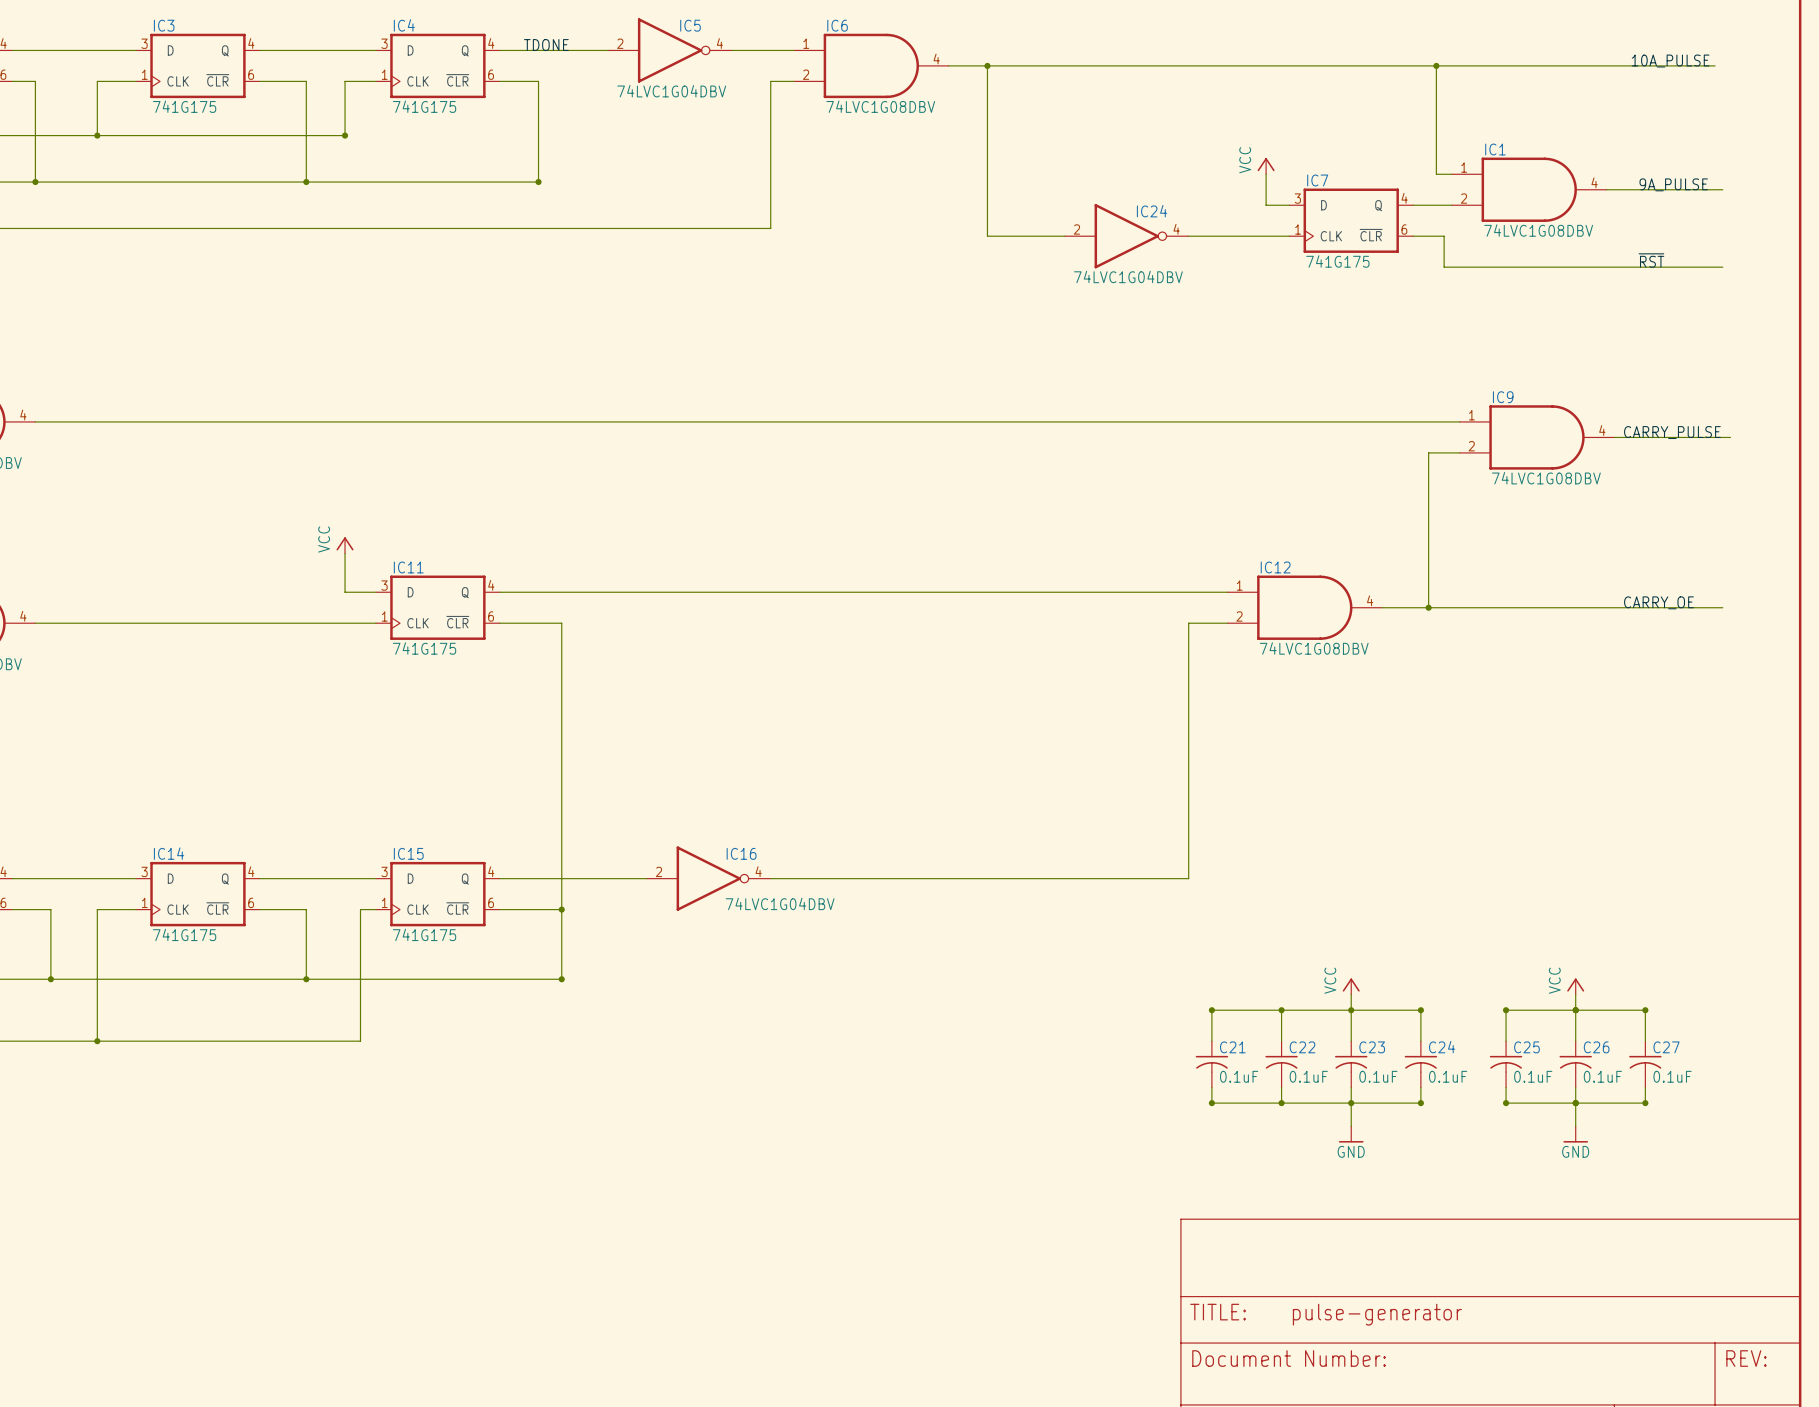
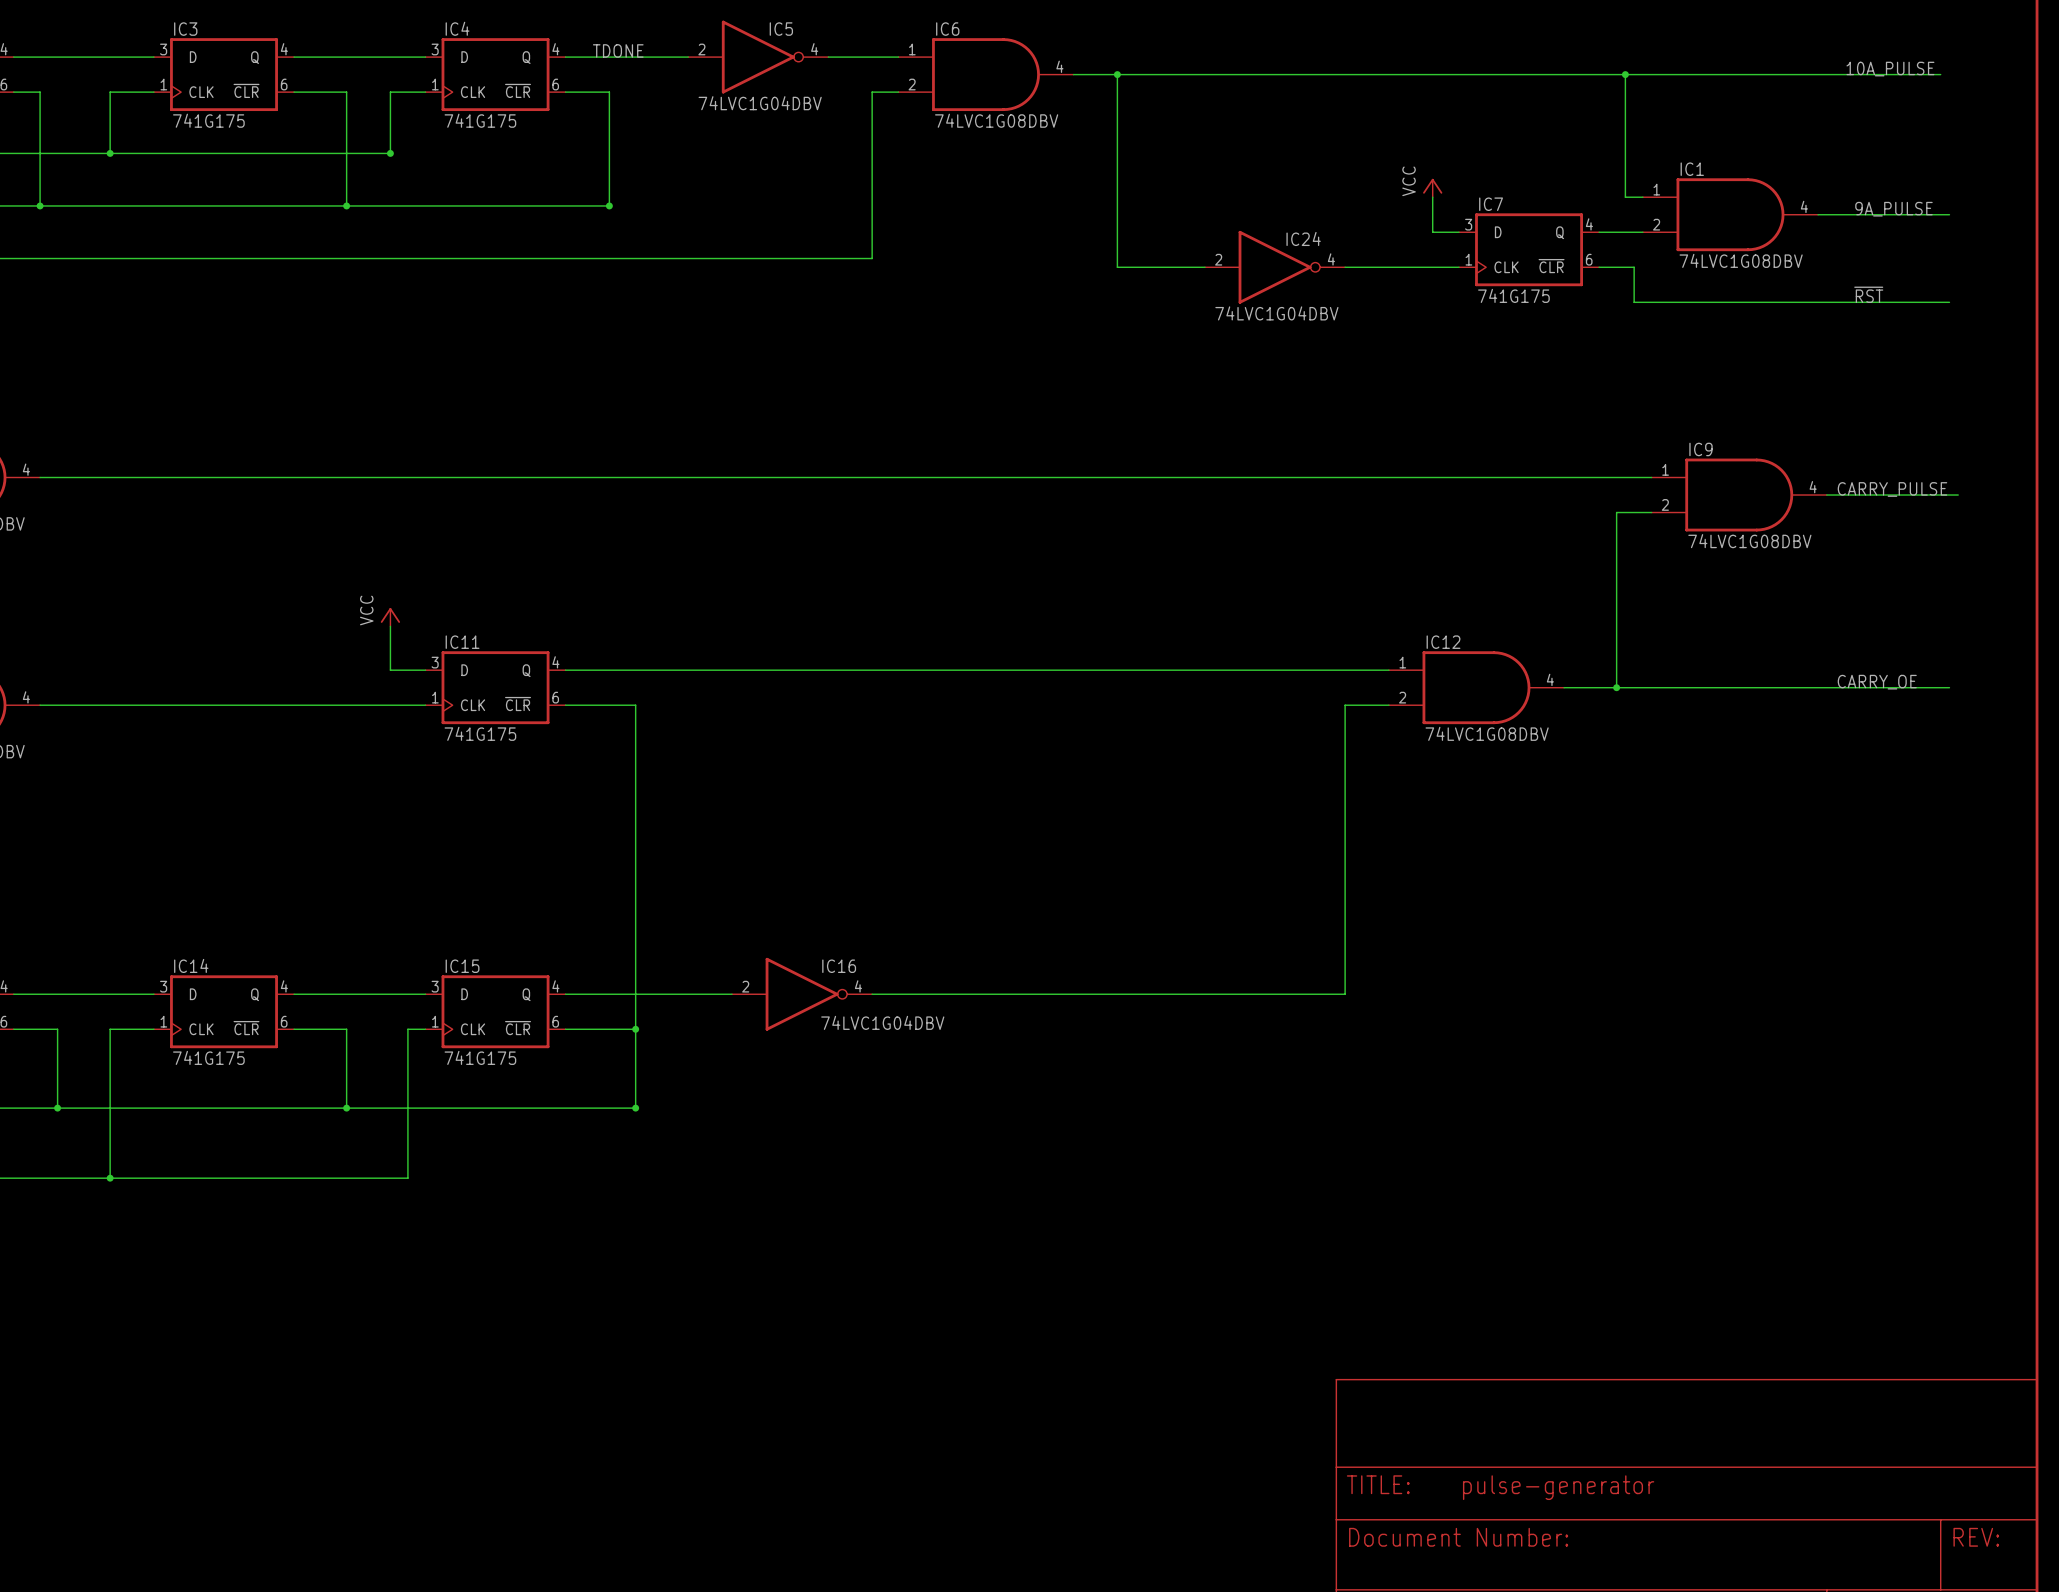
power symbol: VCC (1351, 986) -> none
power symbol: VCC (1575, 986) -> none
wire: (1351, 994) (1351, 1041) -> none
wire: (1575, 994) (1575, 1041) -> none
junction: (1211, 1010) -> none
wire: (1281, 1010) (1281, 1041) -> none
junction: (1281, 1010) -> none
junction: (1351, 1010) -> none
junction: (1420, 1010) -> none
junction: (1506, 1010) -> none
junction: (1575, 1010) -> none
junction: (1645, 1010) -> none
wire: (1211, 1041) (1211, 1010) (1420, 1010) (1420, 1041) -> none
wire: (1506, 1041) (1506, 1010) (1645, 1010) (1645, 1041) -> none
C21: 0.1uF (1211, 1064) -> none
C22: 0.1uF (1281, 1064) -> none
C23: 0.1uF (1351, 1064) -> none
C24: 0.1uF (1420, 1064) -> none
C25: 0.1uF (1506, 1064) -> none
C26: 0.1uF (1575, 1064) -> none
C27: 0.1uF (1645, 1064) -> none
wire: (1211, 1087) (1211, 1103) (1420, 1103) (1420, 1087) -> none
wire: (1281, 1087) (1281, 1103) -> none
wire: (1351, 1087) (1351, 1126) -> none
wire: (1506, 1087) (1506, 1103) (1645, 1103) (1645, 1087) -> none
wire: (1575, 1087) (1575, 1126) -> none
junction: (1211, 1103) -> none
junction: (1281, 1103) -> none
junction: (1351, 1103) -> none
junction: (1420, 1103) -> none
junction: (1506, 1103) -> none
junction: (1575, 1103) -> none
junction: (1645, 1103) -> none
power symbol: GND (1351, 1134) -> none
power symbol: GND (1575, 1134) -> none

